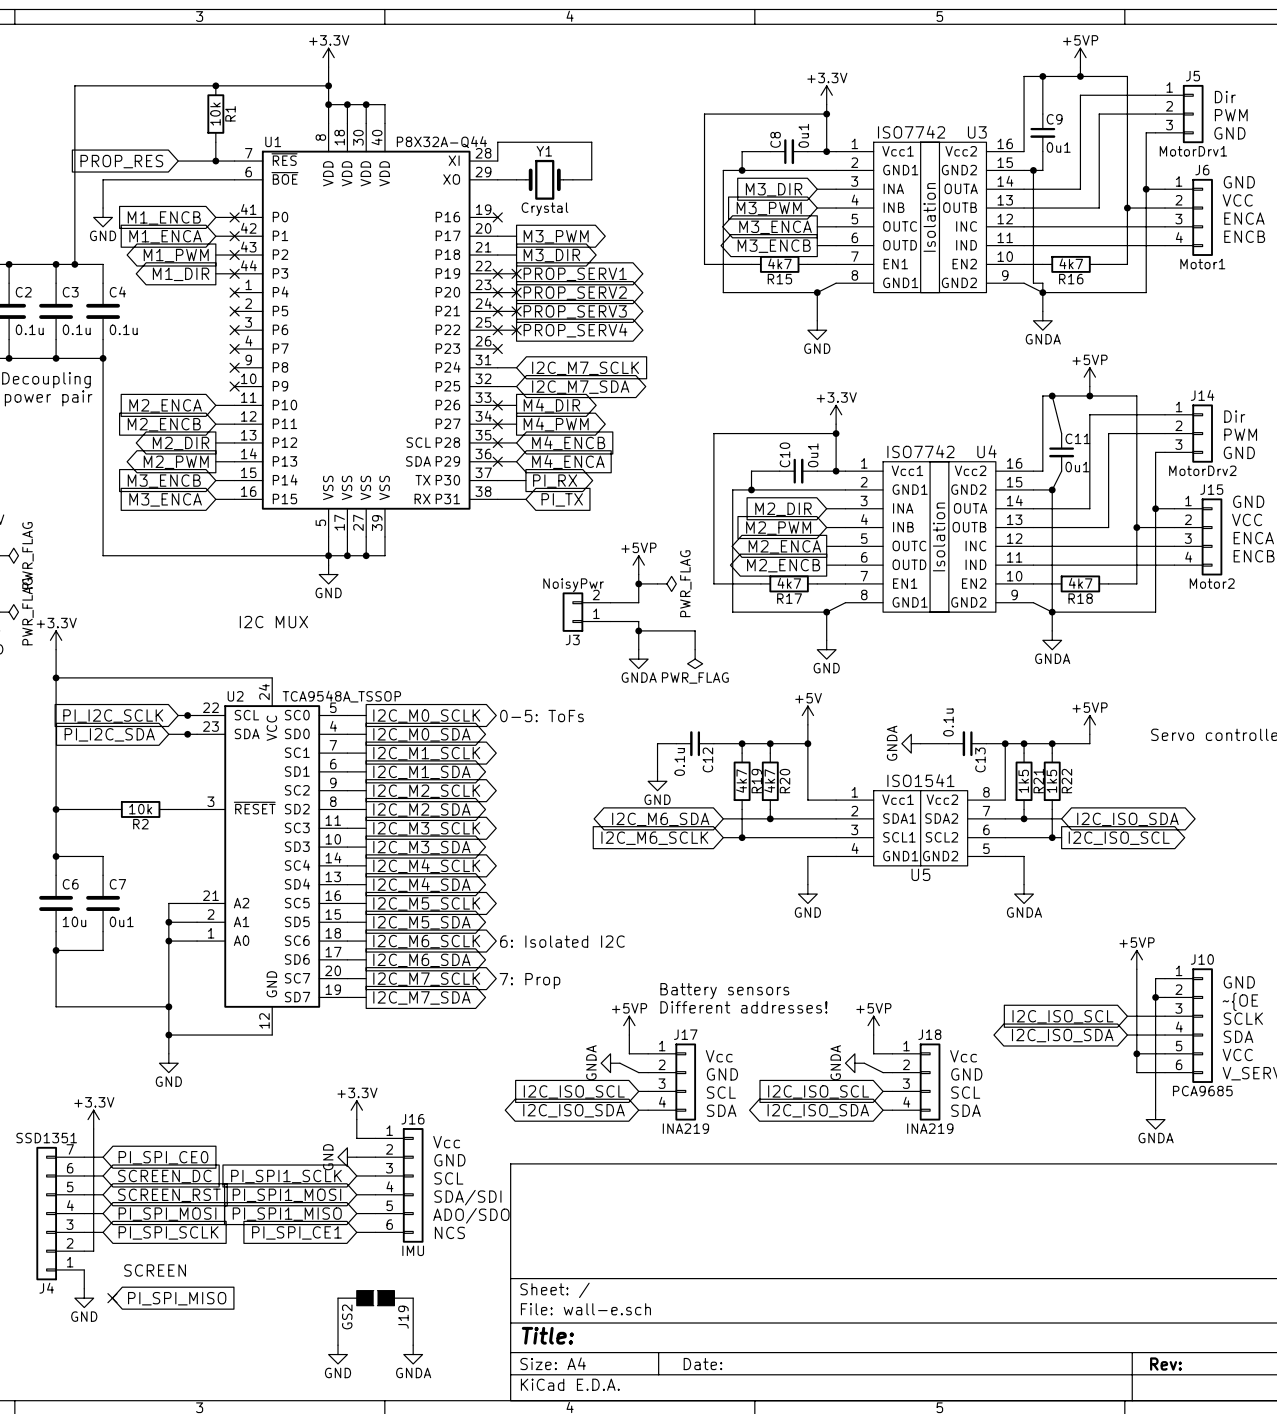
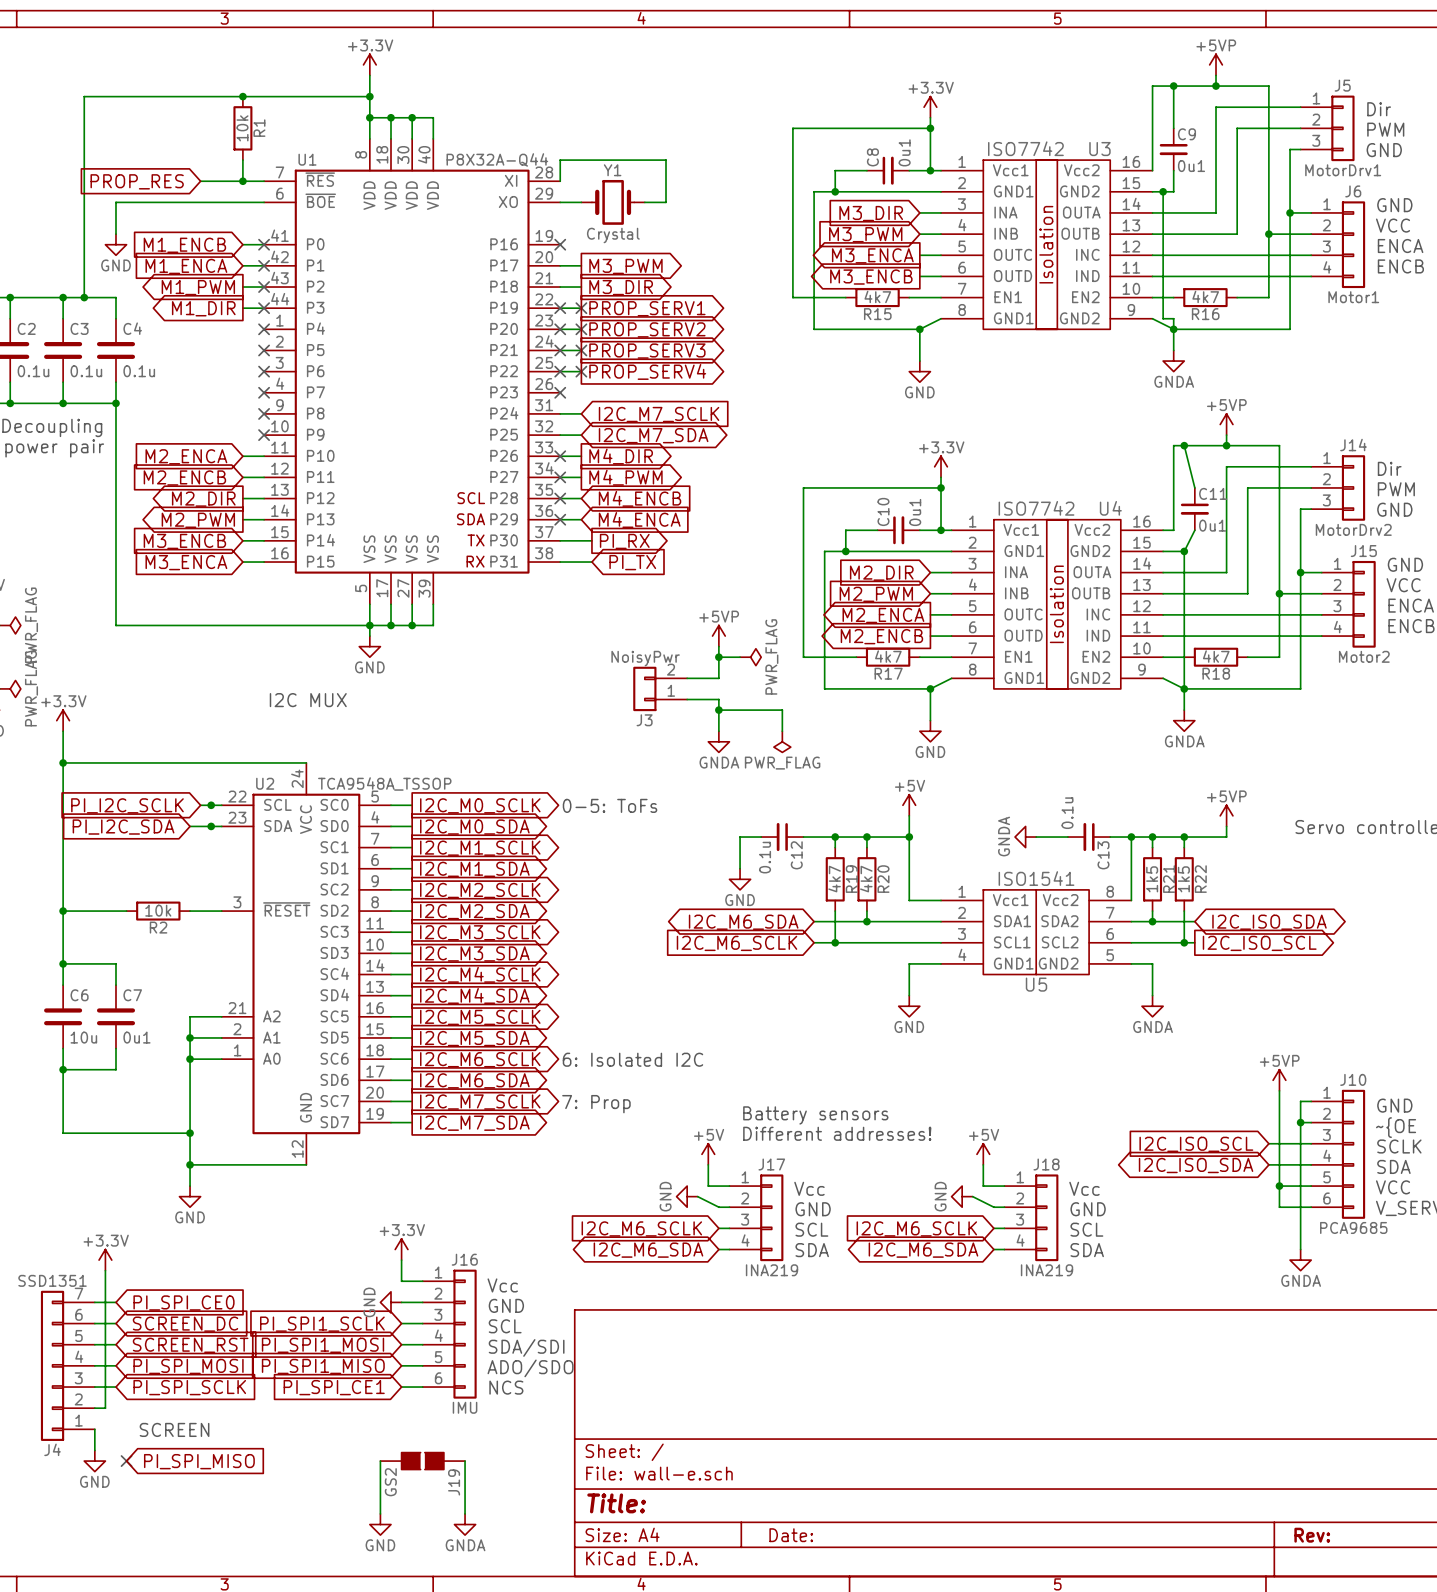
power symbol: +5VP (629, 1025) -> +5V (708, 1154)
power symbol: +5VP (873, 1025) -> +5V (983, 1154)
power symbol: GNDA (610, 1063) -> GND (687, 1196)
power symbol: GNDA (854, 1063) -> GND (962, 1196)
global label: I2C_ISO_SCL (574, 1091) -> I2C_M6_SCLK (641, 1228)
global label: I2C_ISO_SCL (818, 1091) -> I2C_M6_SCLK (916, 1228)
global label: I2C_ISO_SDA (574, 1110) -> I2C_M6_SDA (648, 1250)
global label: I2C_ISO_SDA (818, 1110) -> I2C_M6_SDA (923, 1250)

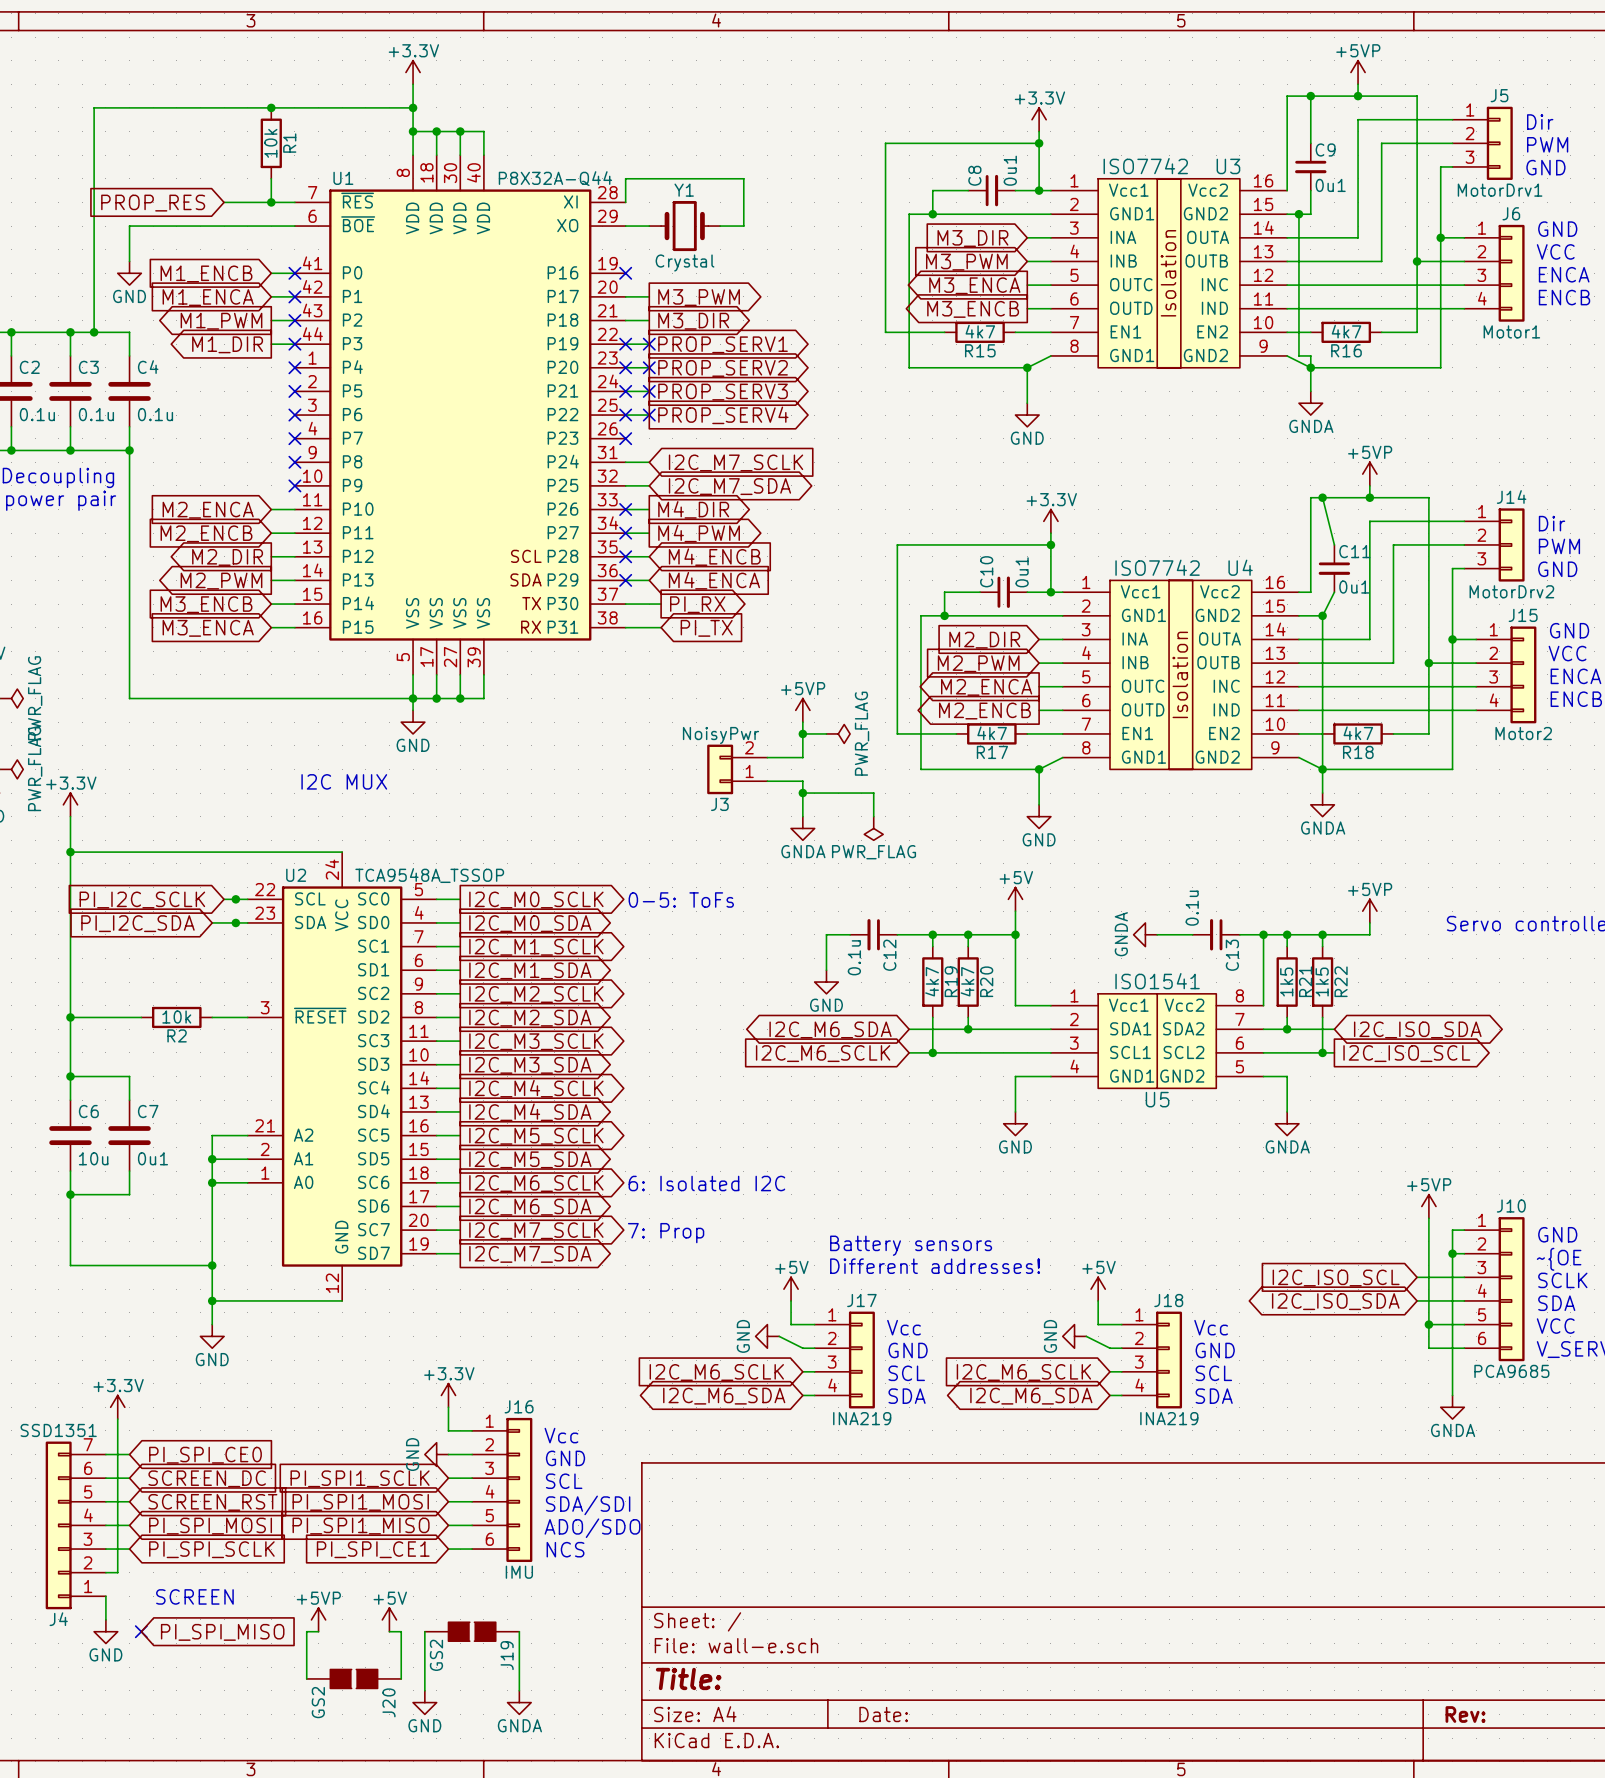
power symbol: none -> +5VP (318, 1619)
power symbol: none -> +5V (389, 1619)
wire: none -> (318, 1631) (306, 1631) (306, 1678)
wire: none -> (389, 1631) (401, 1631) (401, 1678)
J20: none -> GS2 (353, 1678)

